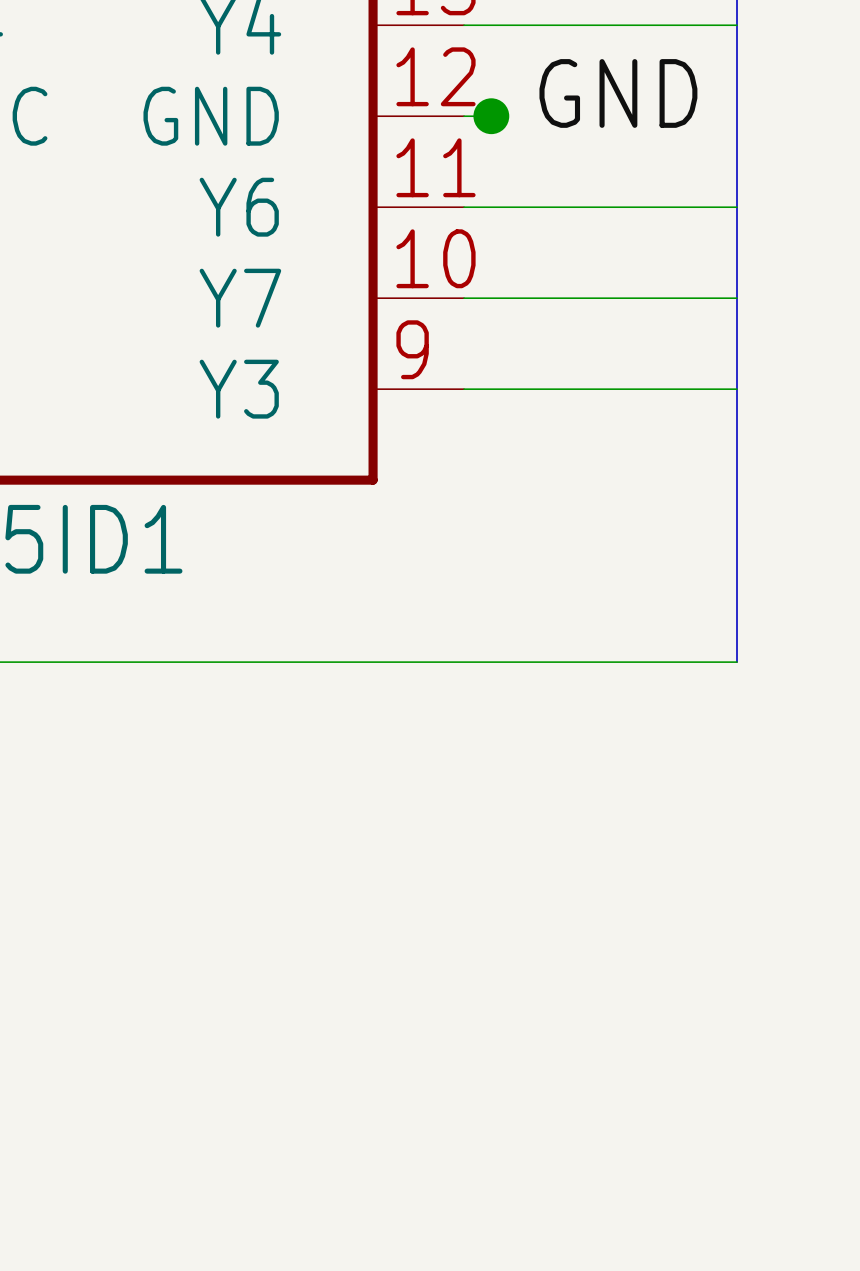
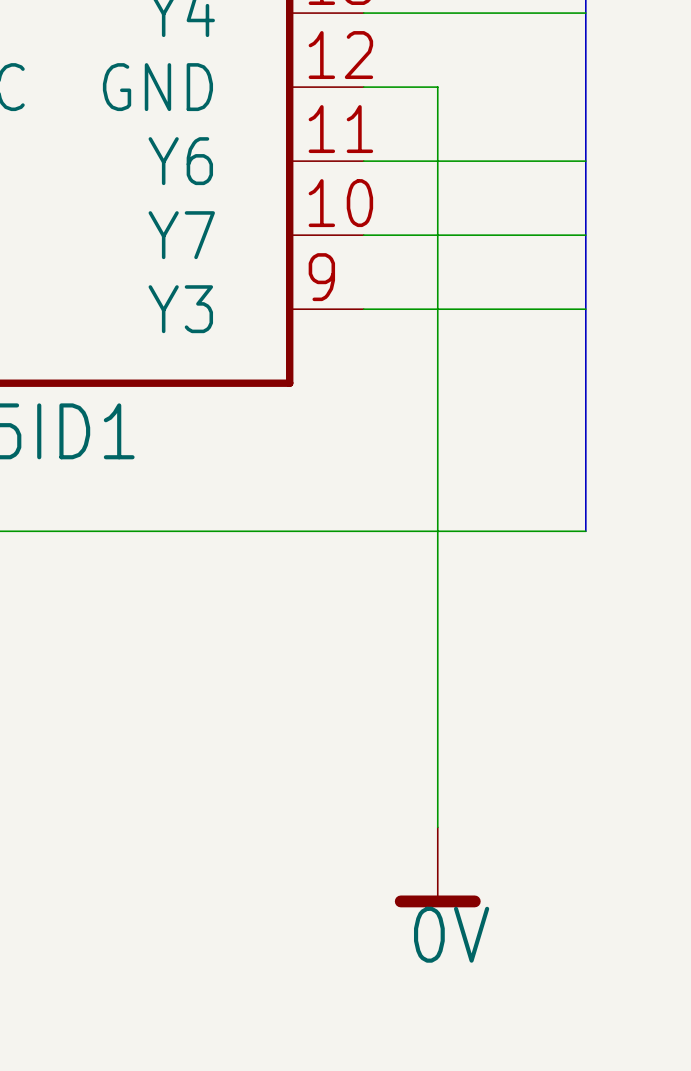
label: GND (618, 93) -> none
wire: none -> (385, 87) (437, 87) (437, 827)
junction: (491, 116) -> none
power symbol: none -> 0V (437, 867)

